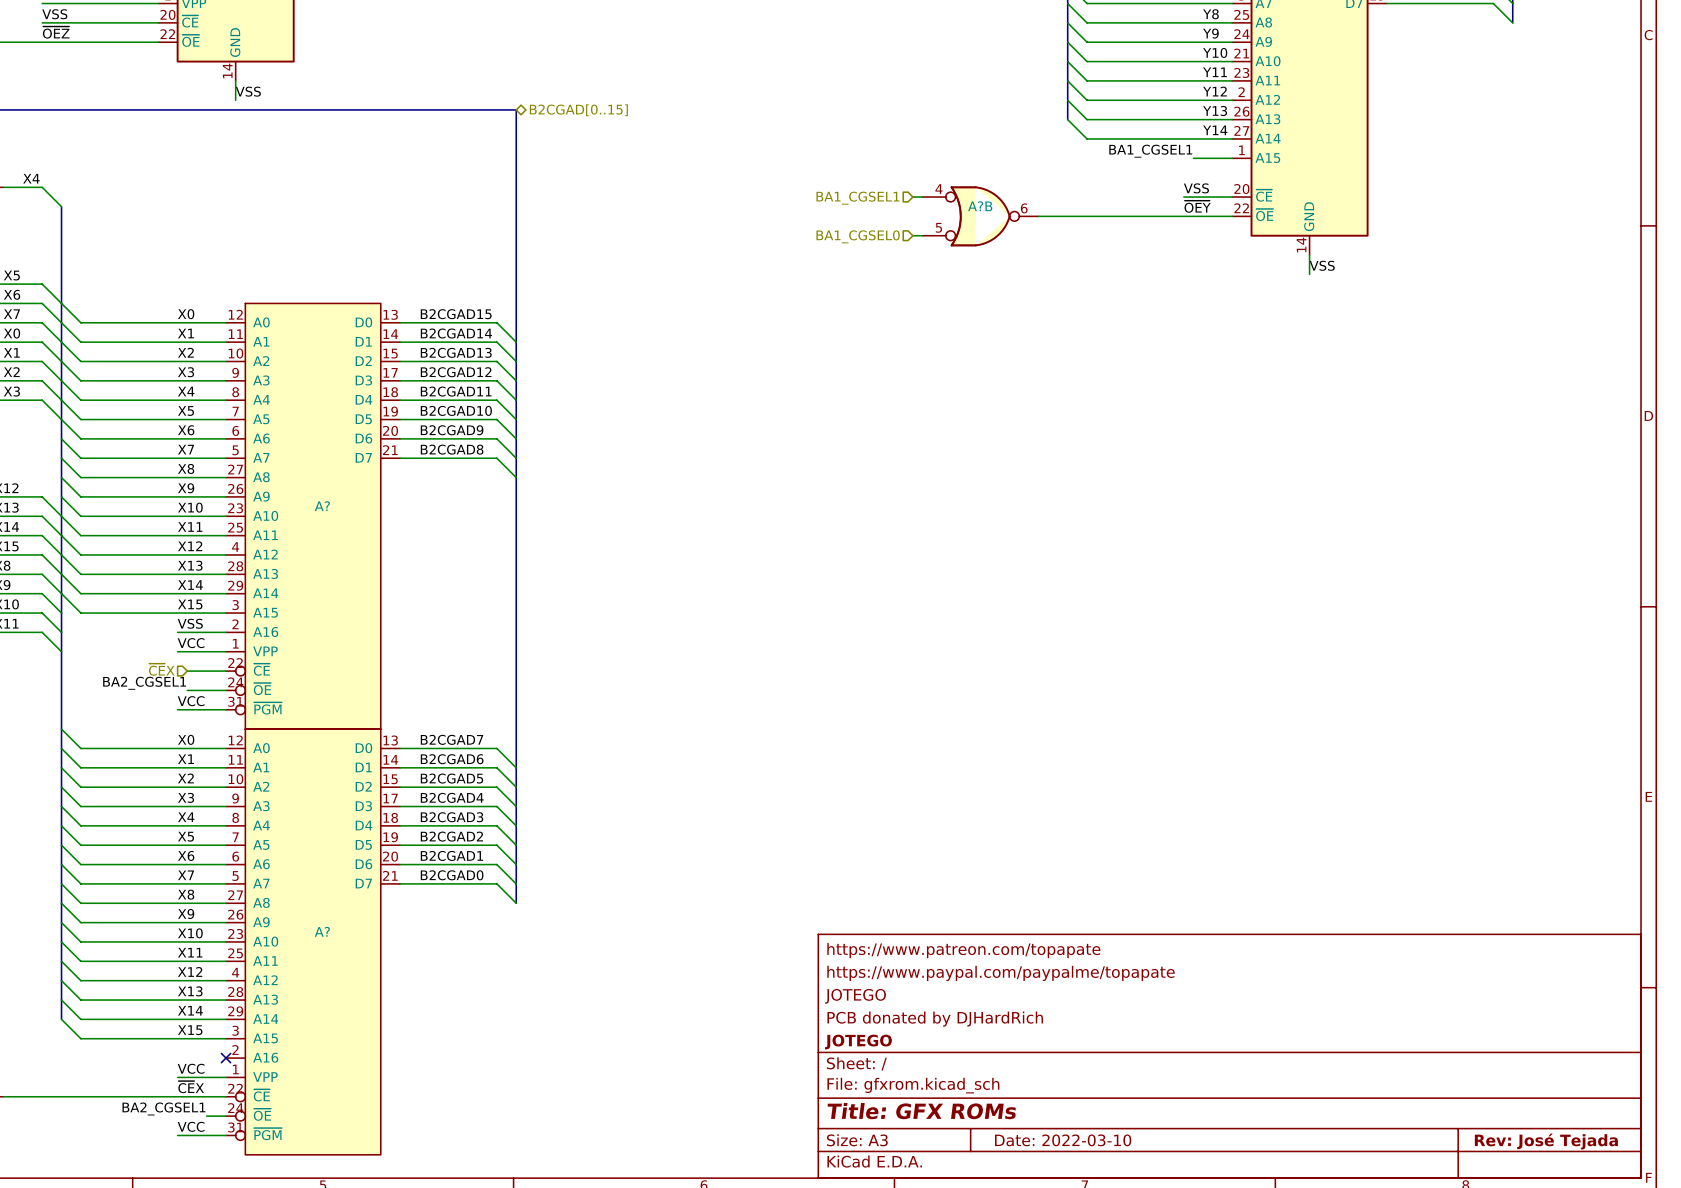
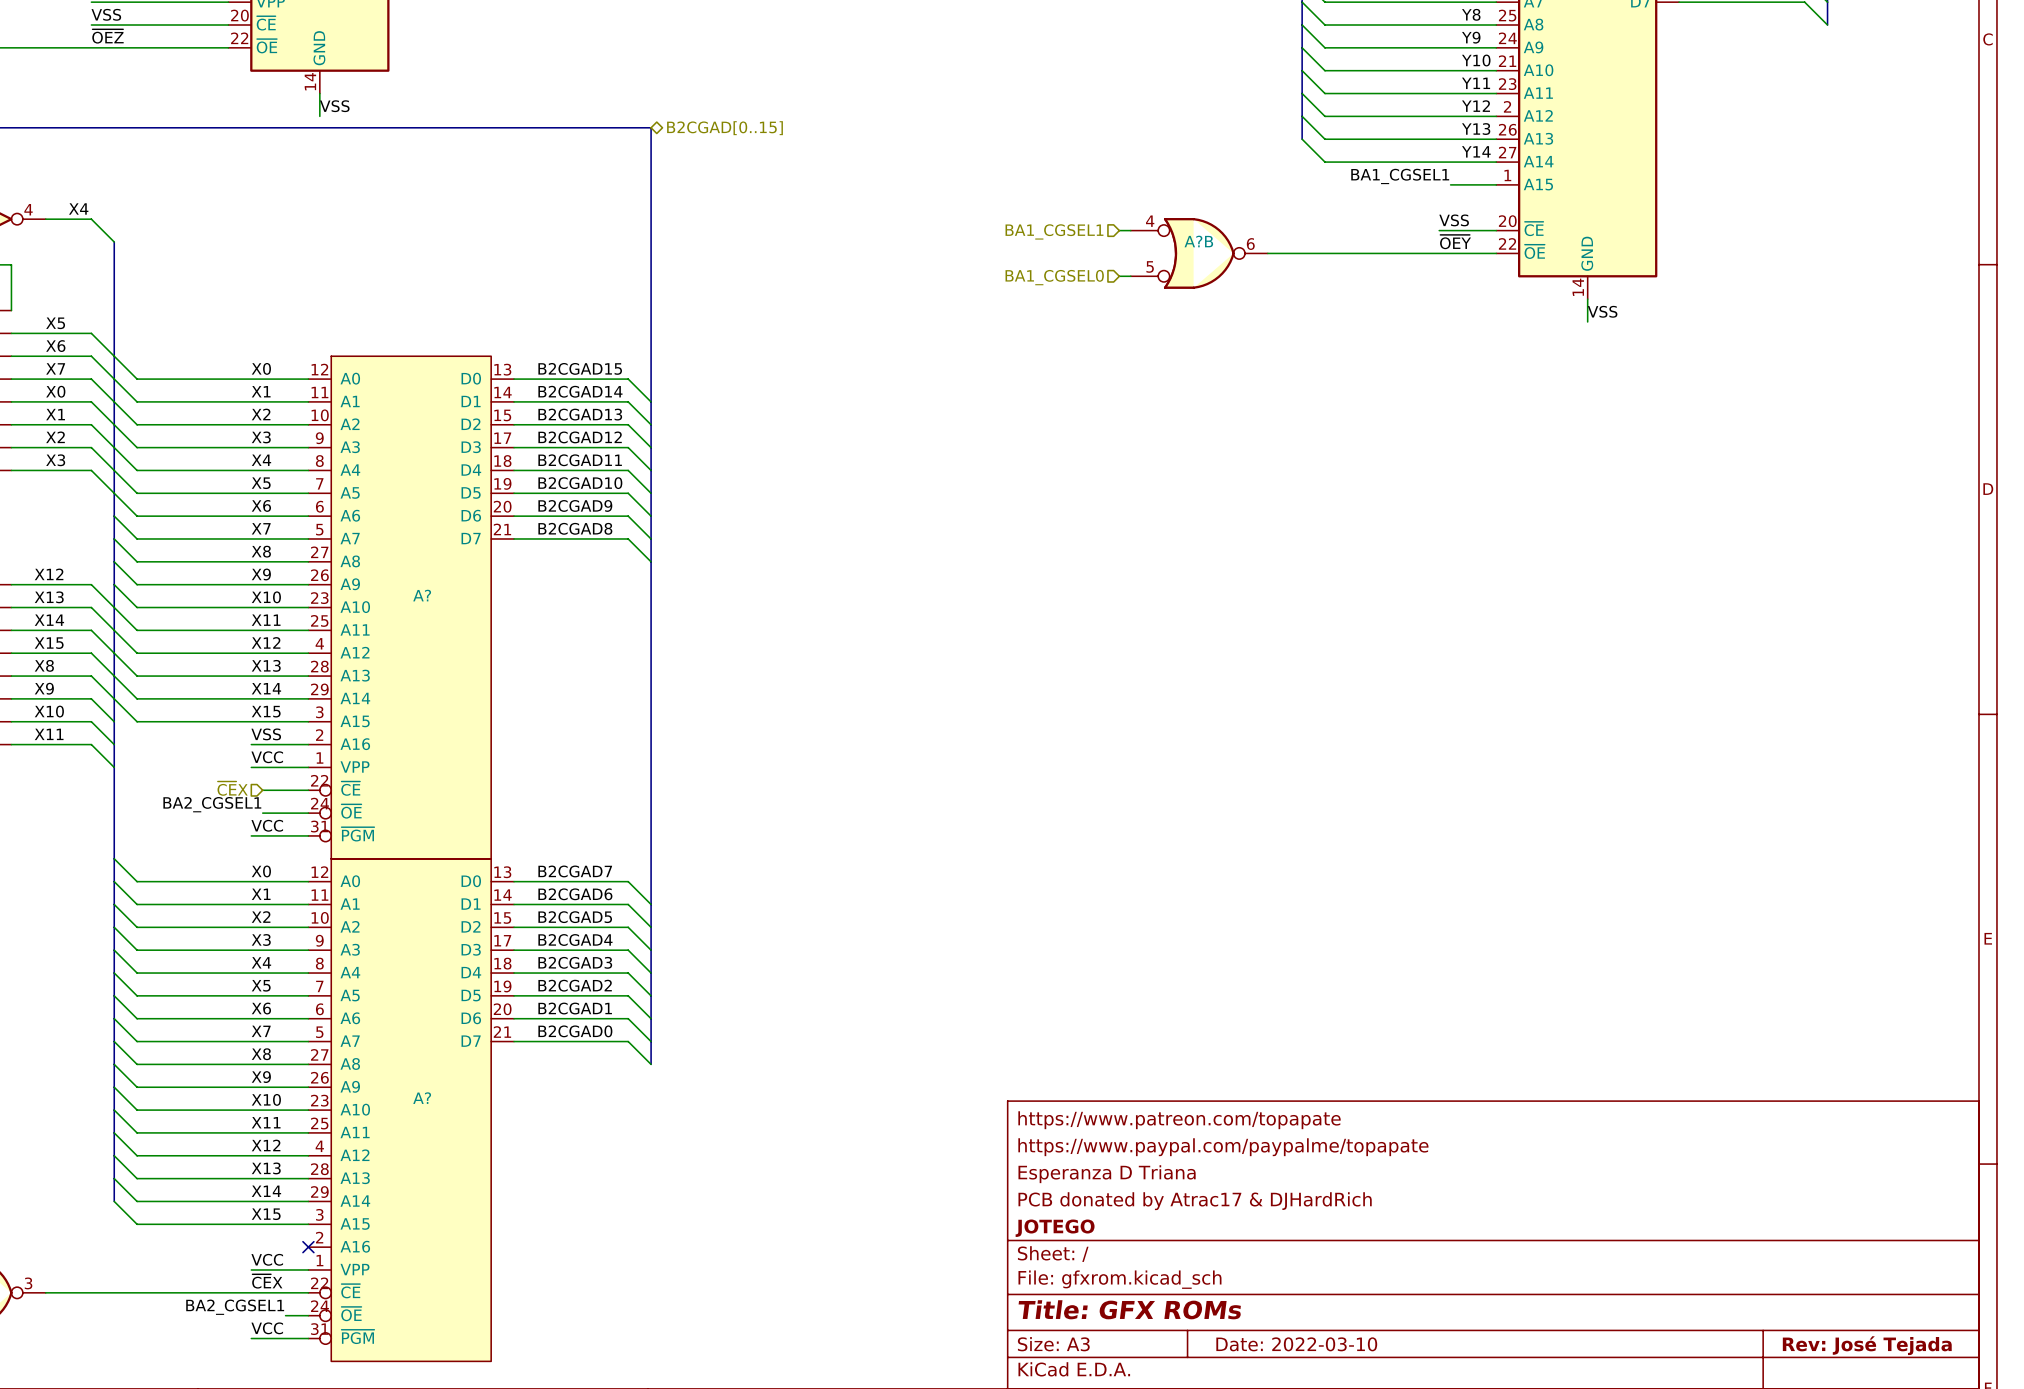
title block: JOTEGO (855, 996) -> Esperanza D Triana (1107, 1174)
title block: PCB donated by DJHardRich (935, 1019) -> PCB donated by Atrac17 & DJHardRich (1195, 1201)

